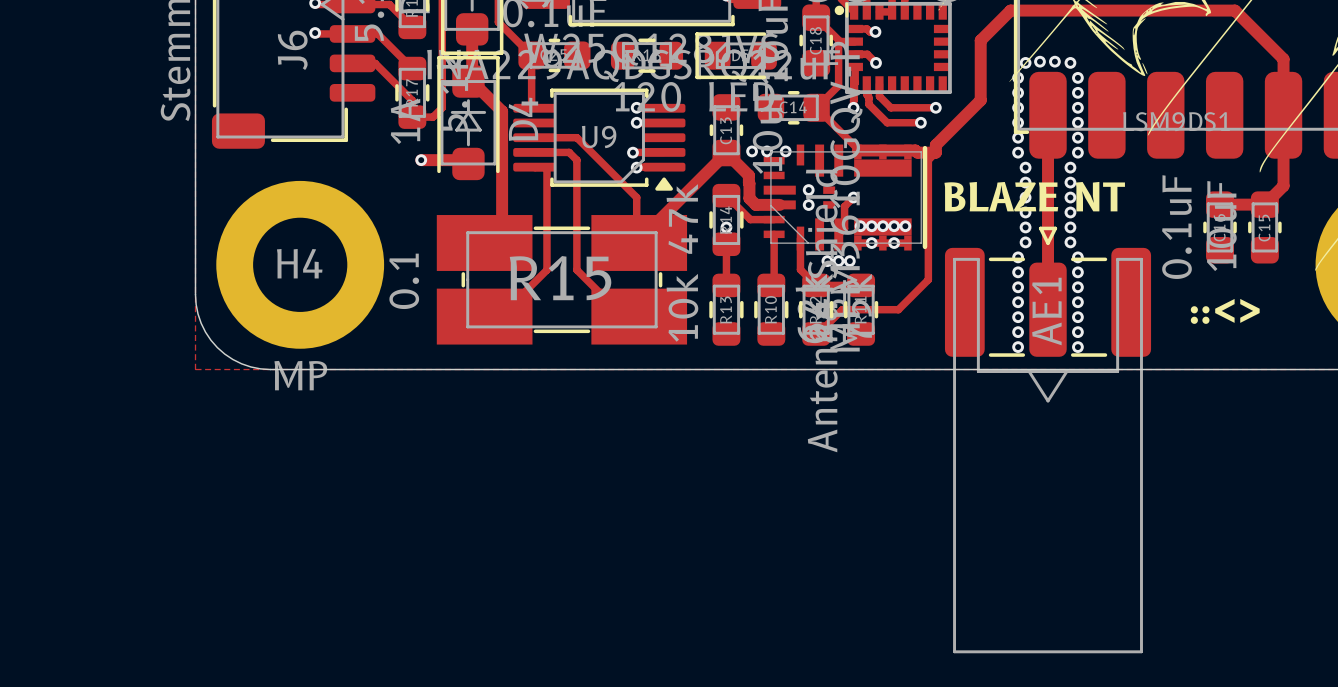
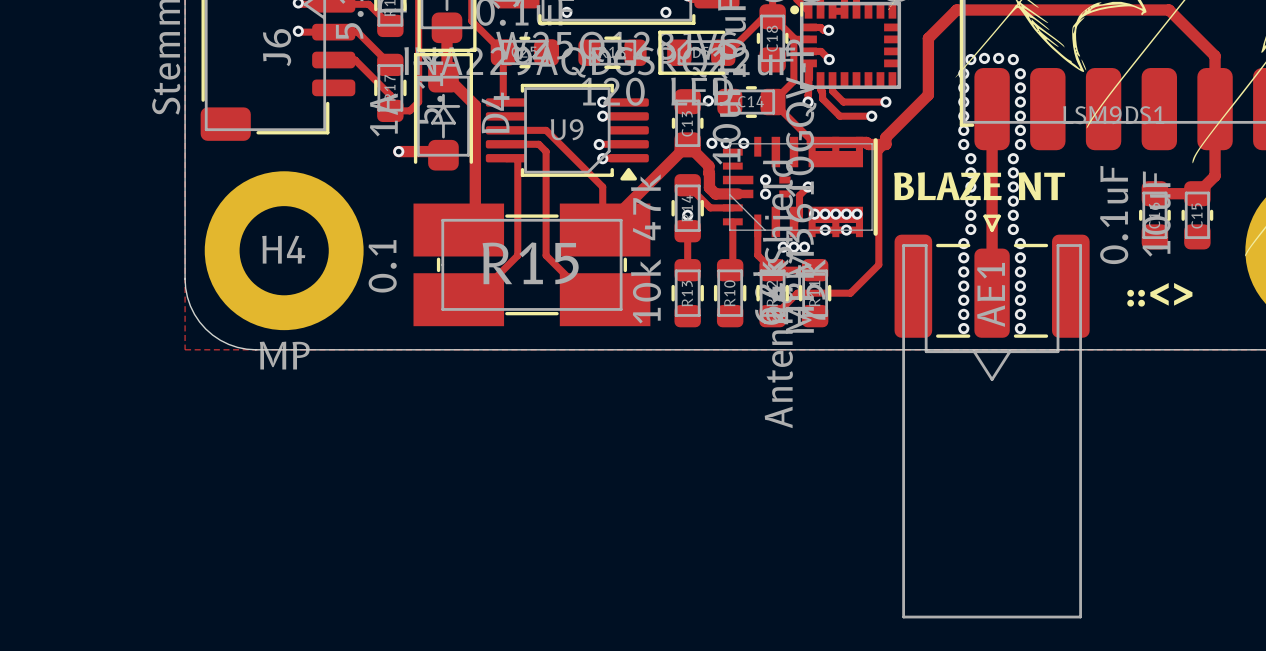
via: none -> (566, 12)
via: none -> (665, 12)
track: none -> (772, 16) (764, 16) (728, 52) (723, 52)
via: none -> (708, 100)

